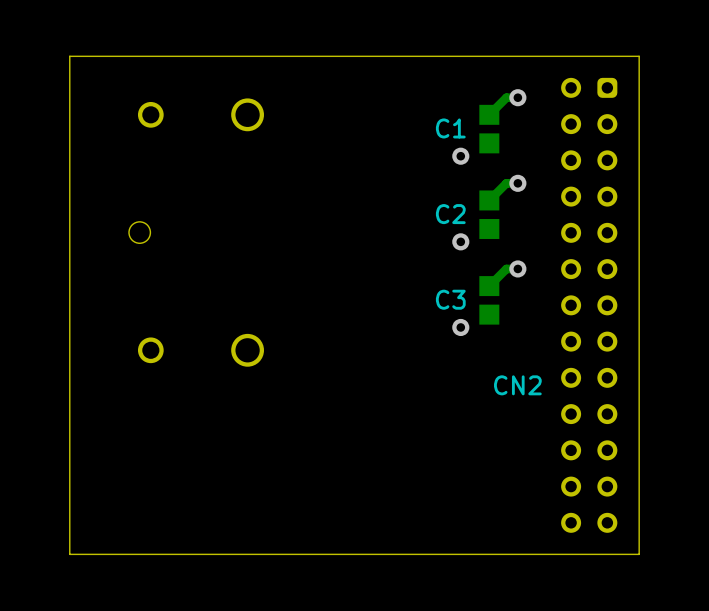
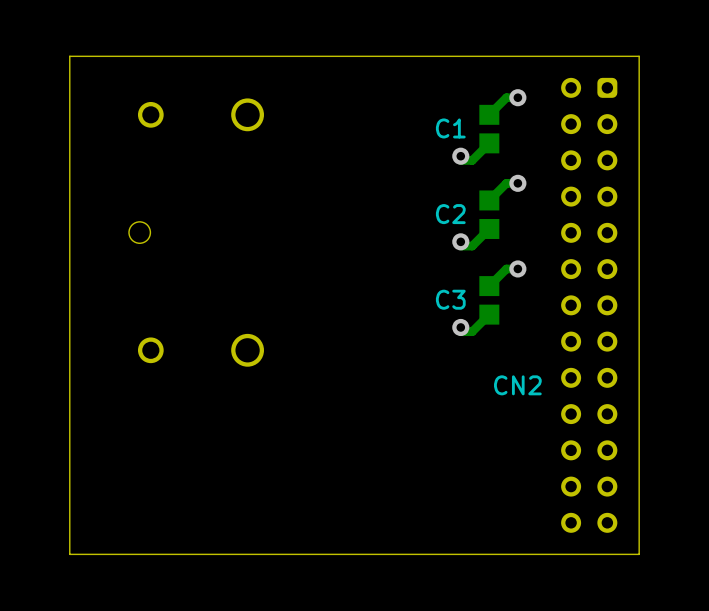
track: none -> (489, 143) (472, 160) (460, 160)
track: none -> (489, 228) (472, 246) (460, 246)
track: none -> (489, 314) (472, 331) (460, 331)

